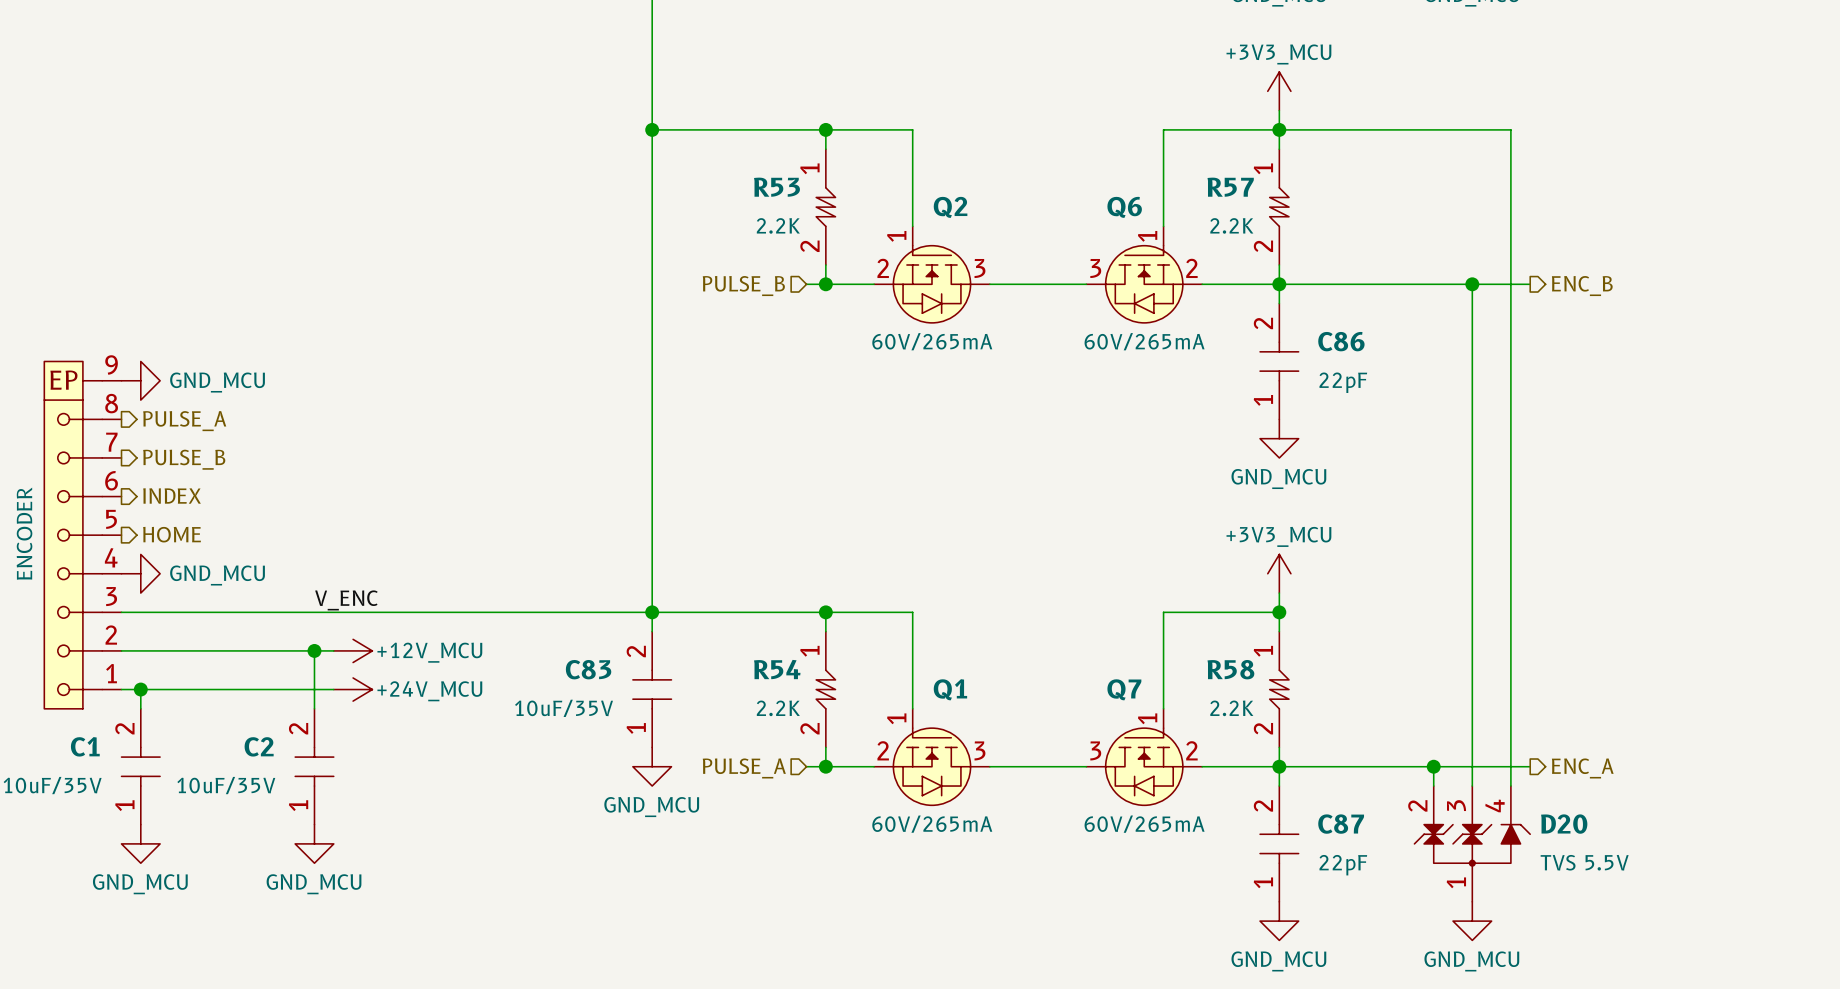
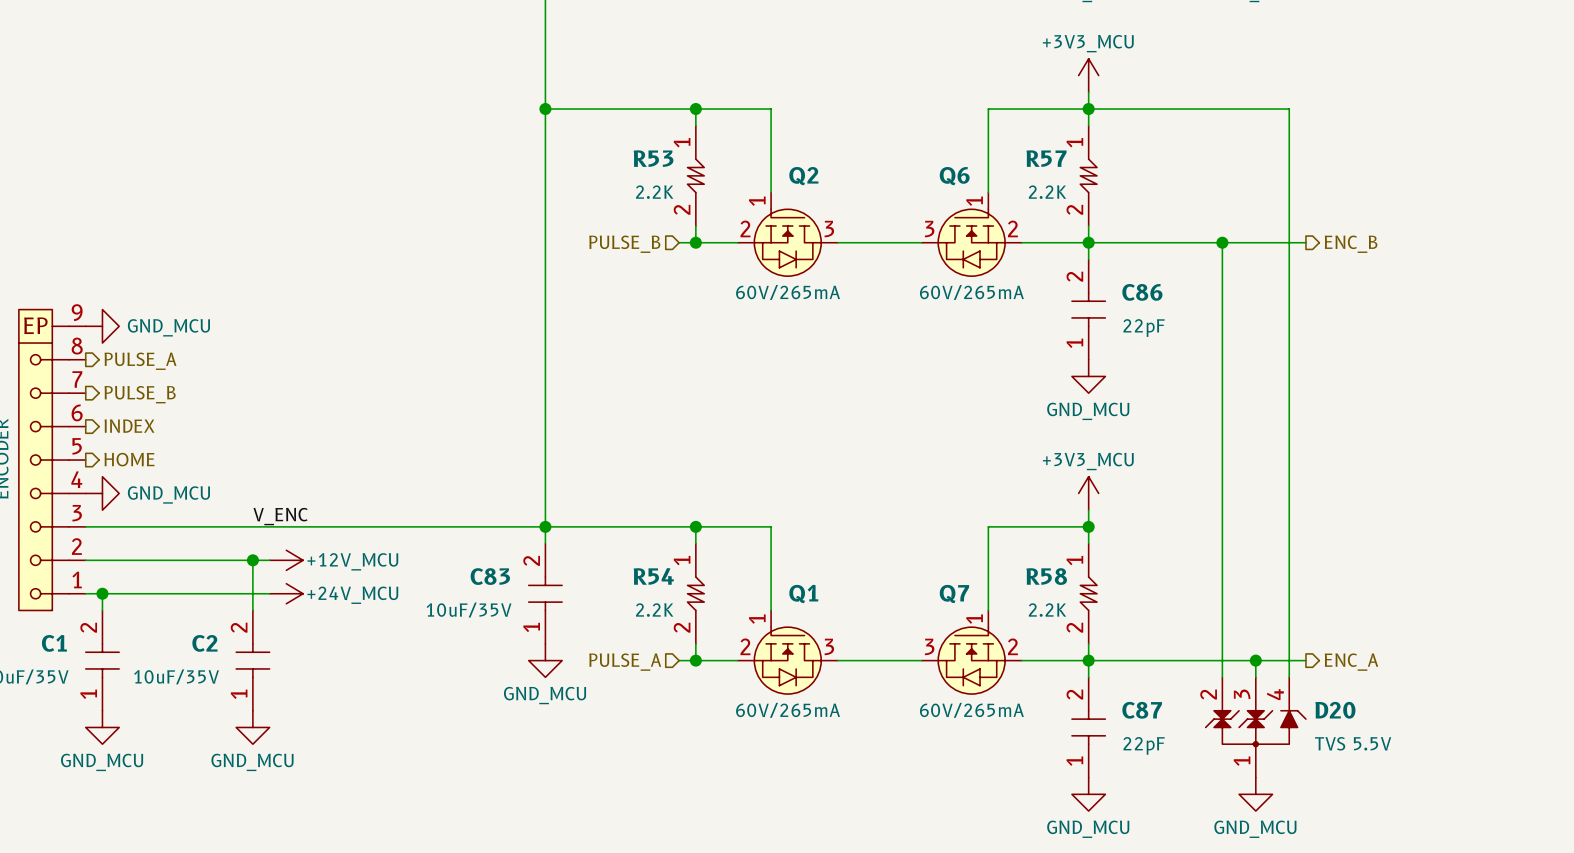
wire: (1472, 284) (1472, 766) -> (1222, 242) (1222, 660)
junction position: (1472, 284) -> (1222, 242)
junction position: (1433, 766) -> (1255, 660)

